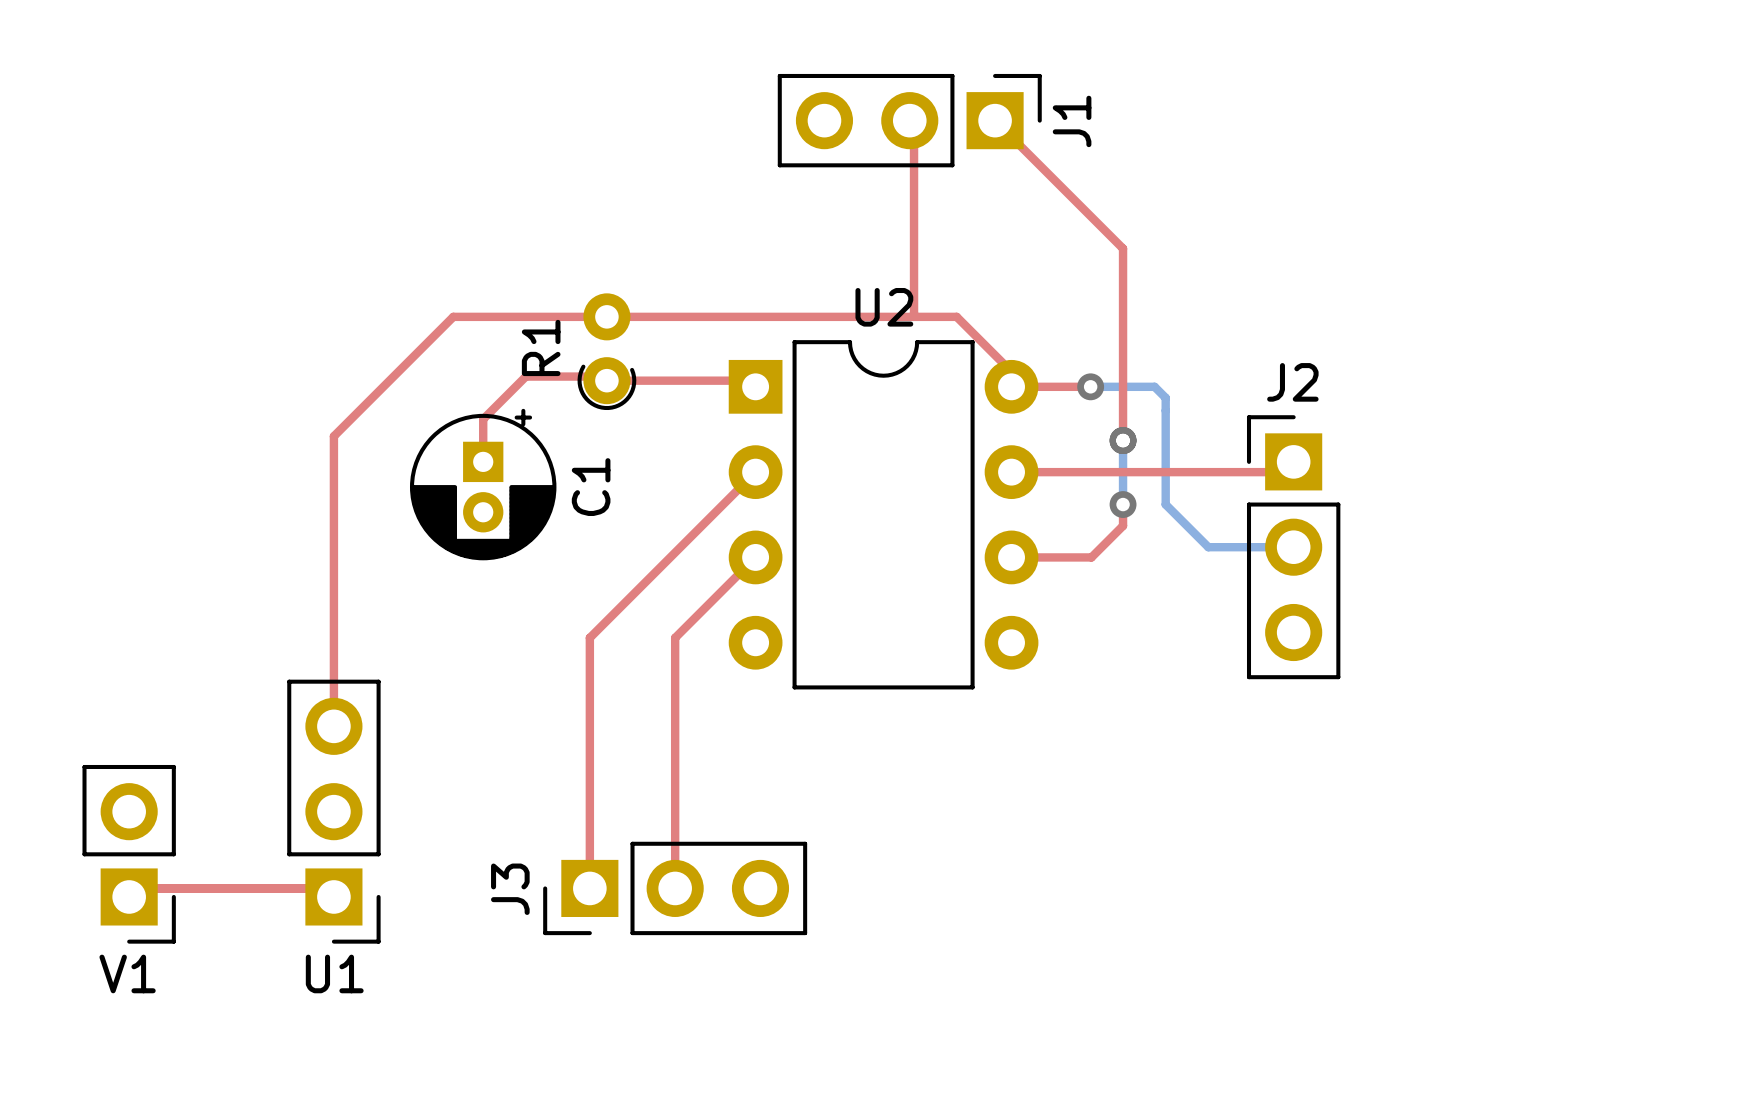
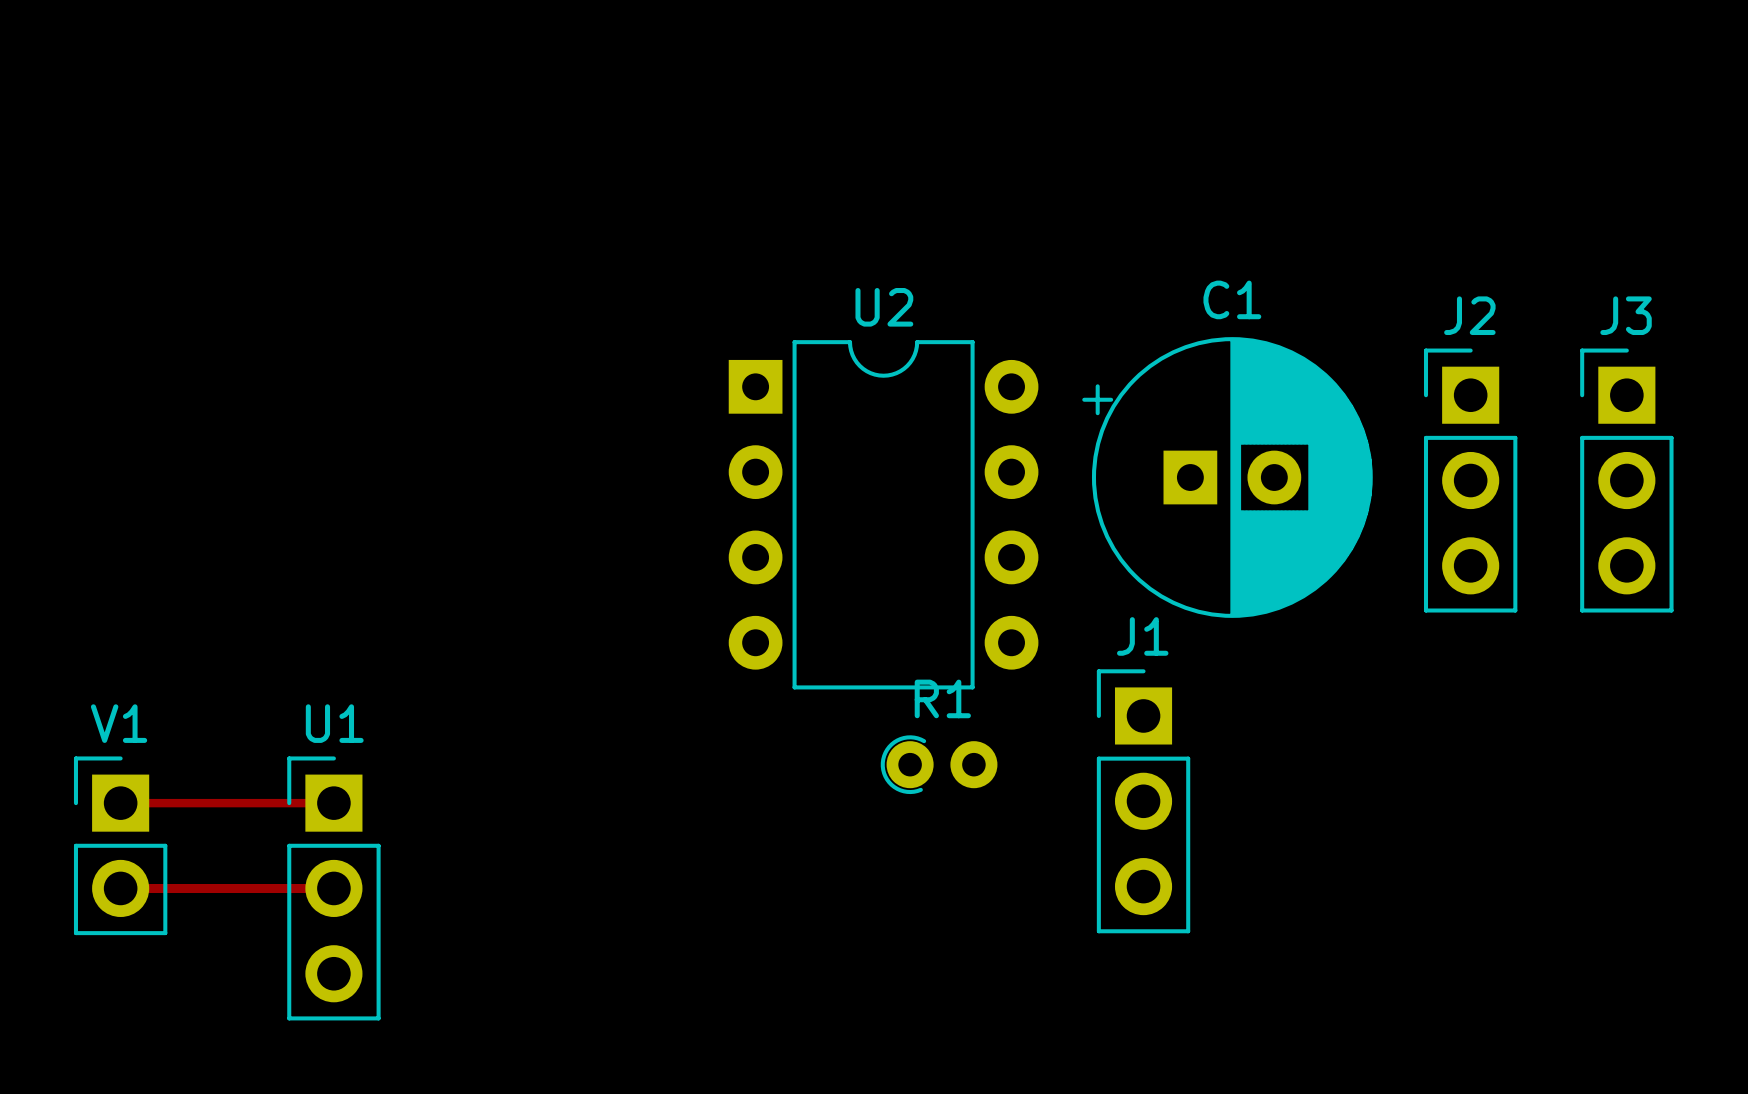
top track: (909, 120) (914, 124) (914, 316) -> none
J1 rotation: 0° (909, 120) -> 90° counterclockwise (1143, 801)
J1 position: (909, 120) -> (1143, 801)
top track: (995, 120) (1123, 248) (1123, 440) -> none
R1 rotation: 0° (606, 351) -> 90° clockwise (939, 764)
R1 position: (606, 351) -> (939, 764)
top track: (611, 376) (525, 376) (483, 419) (483, 461) -> none
top track: (1016, 376) (956, 316) (453, 316) (333, 436) (333, 726) -> none
top track: (606, 380) (756, 380) (751, 385) (760, 385) -> none
top track: (1011, 386) (1090, 386) -> none
bottom track: (1090, 386) (1154, 386) (1165, 397) (1165, 504) (1208, 547) (1293, 547) -> none
via: (1090, 386) -> none
C1 footprint: [409, 408, 557, 561] -> [1082, 337, 1373, 618]
bottom track: (1123, 440) (1123, 504) -> none
via: (1123, 440) -> none
top track: (1293, 461) (1283, 472) (1011, 472) -> none
top track: (755, 472) (589, 637) (589, 888) -> none
C1 name position: C1 (591, 487) -> C1 (1232, 299)
top track: (1123, 504) (1123, 525) (1091, 557) (1011, 557) -> none
via: (1123, 504) -> none
J2 position: (1293, 547) -> (1470, 480)
top track: (755, 557) (675, 637) (675, 888) -> none
top track: none -> (120, 803) (333, 803)
U1 rotation: 0° (333, 811) -> 180° (333, 888)
V1 rotation: 0° (129, 854) -> 180° (120, 845)
J3 rotation: 0° (675, 888) -> 90° clockwise (1626, 480)
J3 position: (675, 888) -> (1626, 480)

